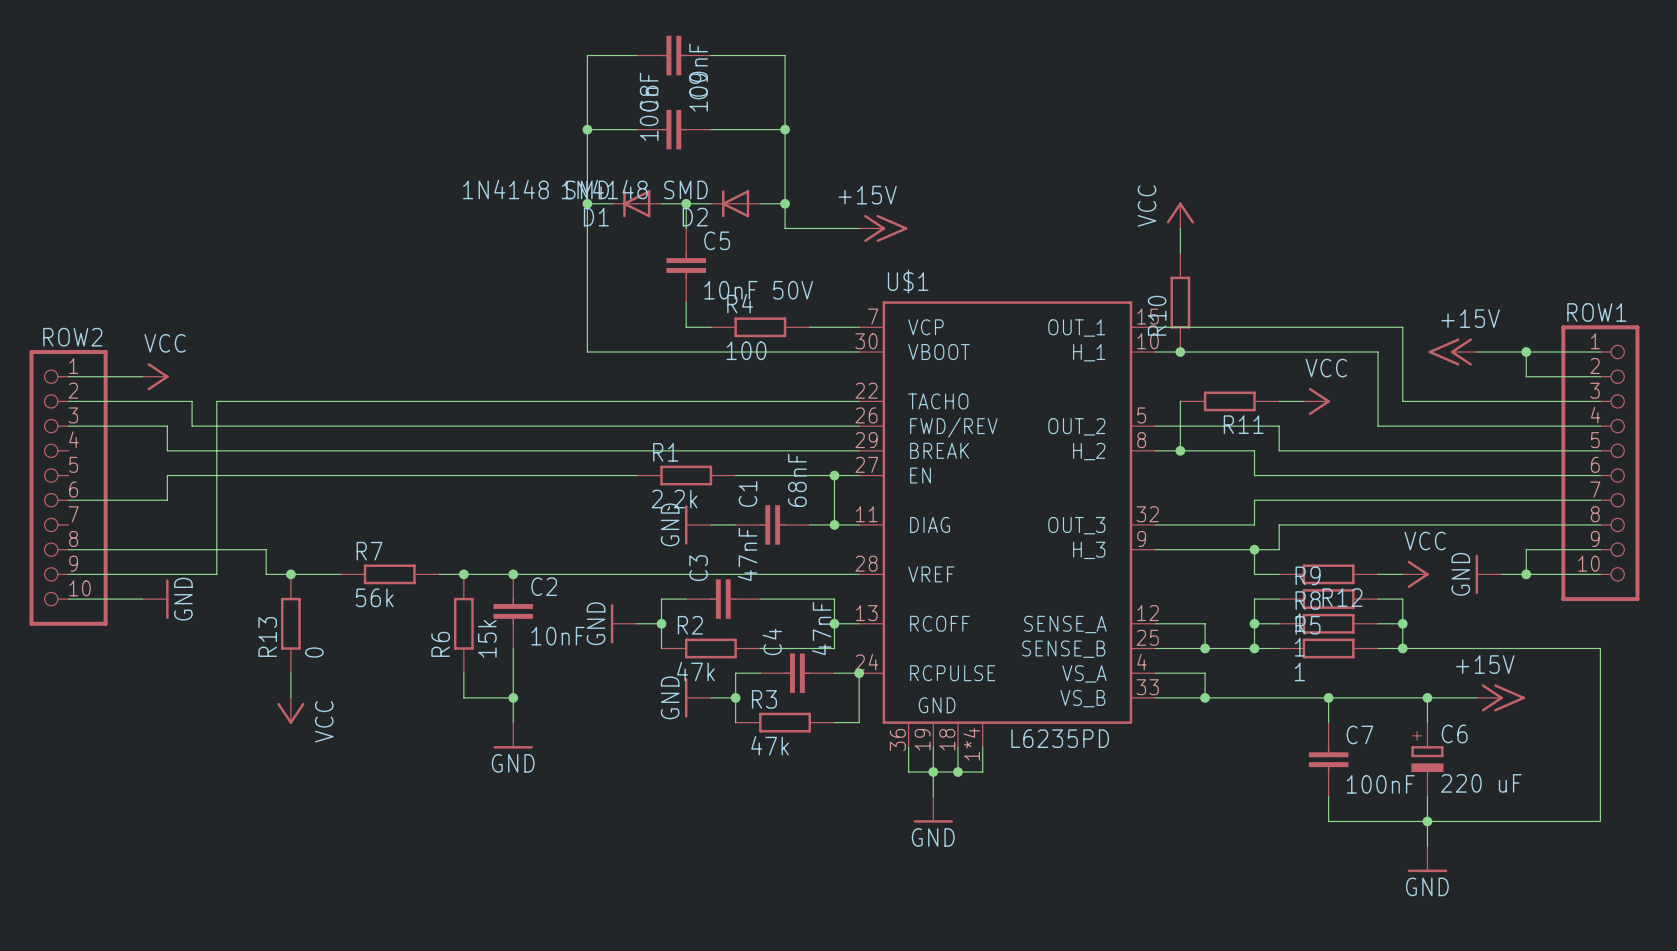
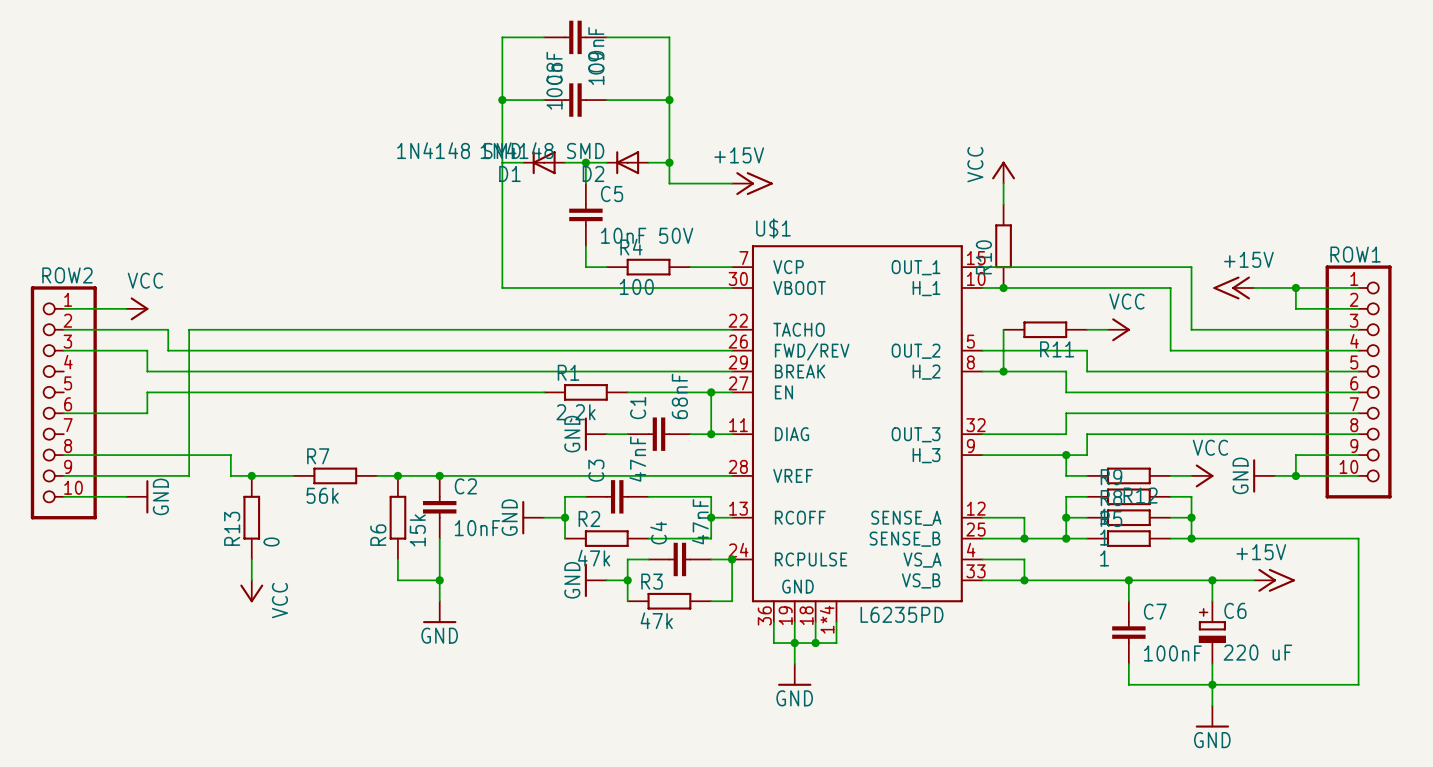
junction: (587, 203) -> none

